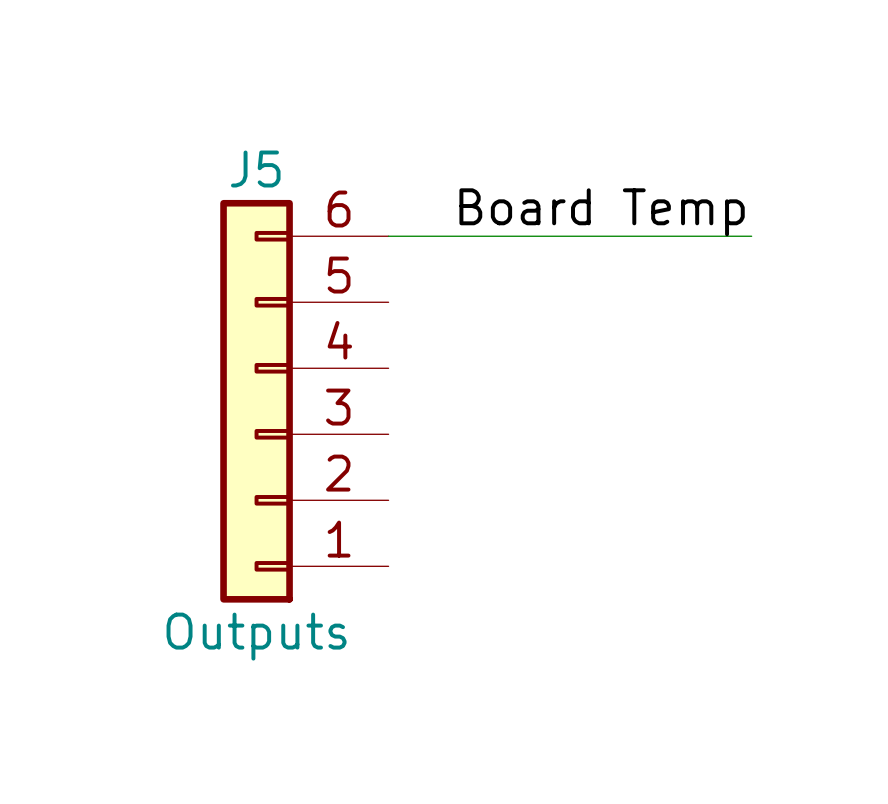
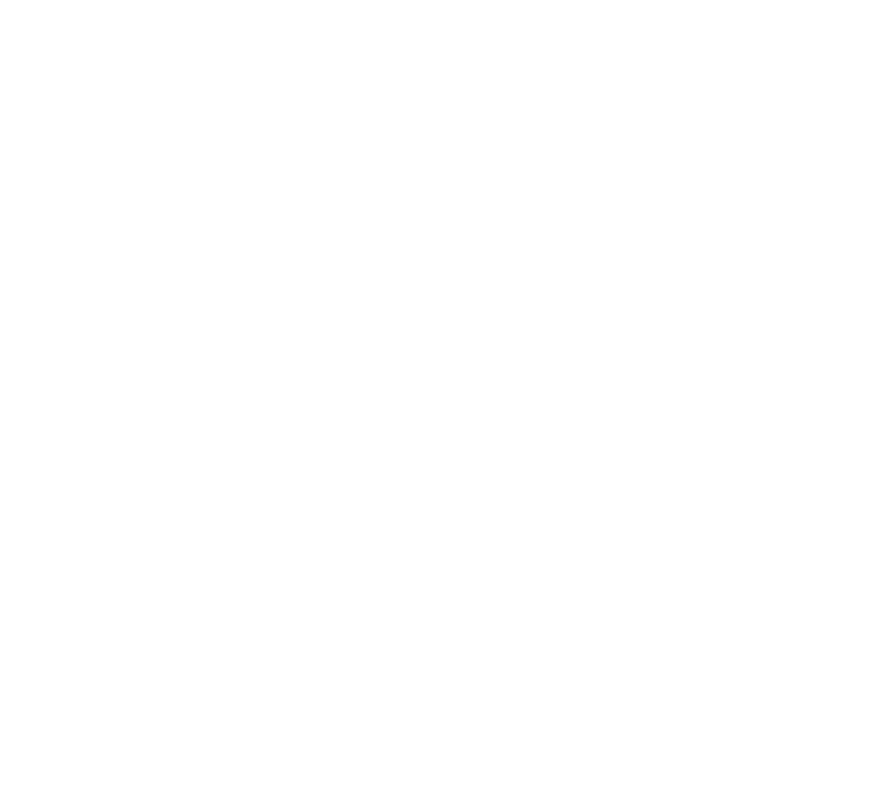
label: Board Temp (602, 212) -> none
wire: (388, 236) (751, 236) -> none
J5: Outputs (304, 401) -> none

